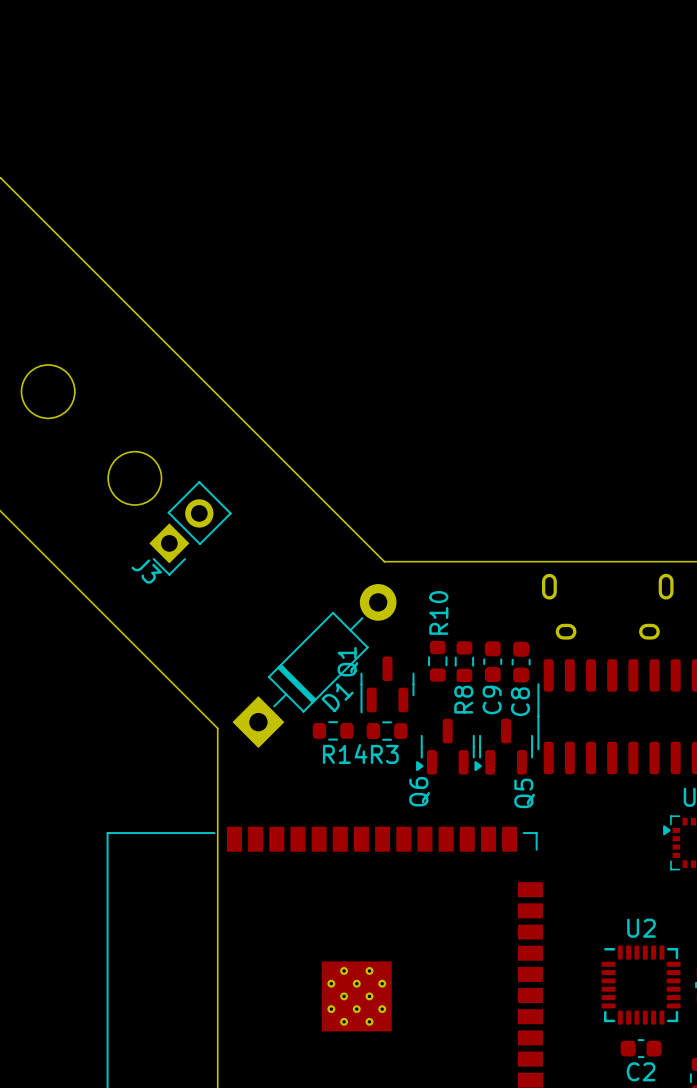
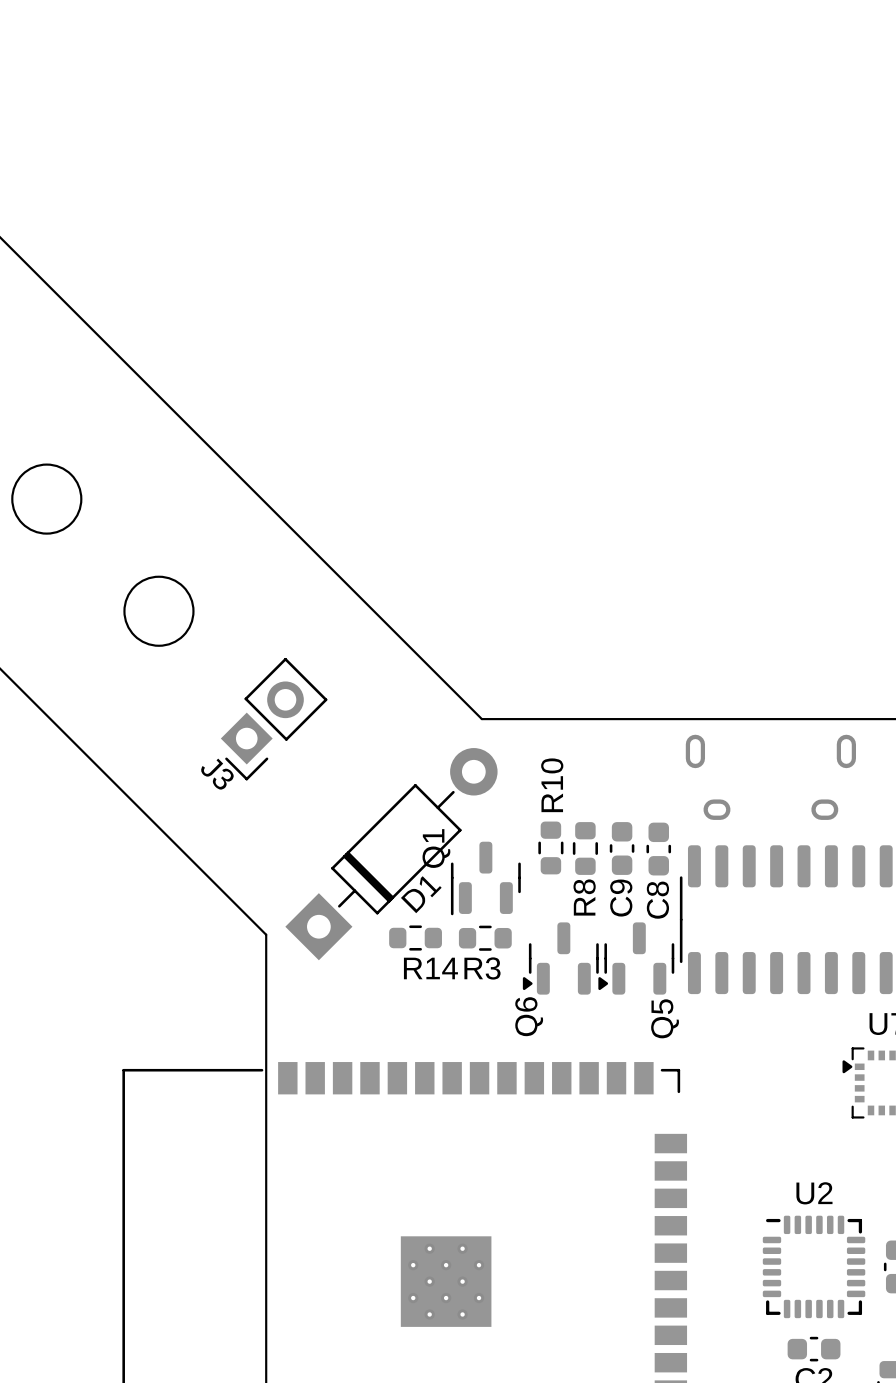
J3 position: (190, 528) -> (274, 719)

